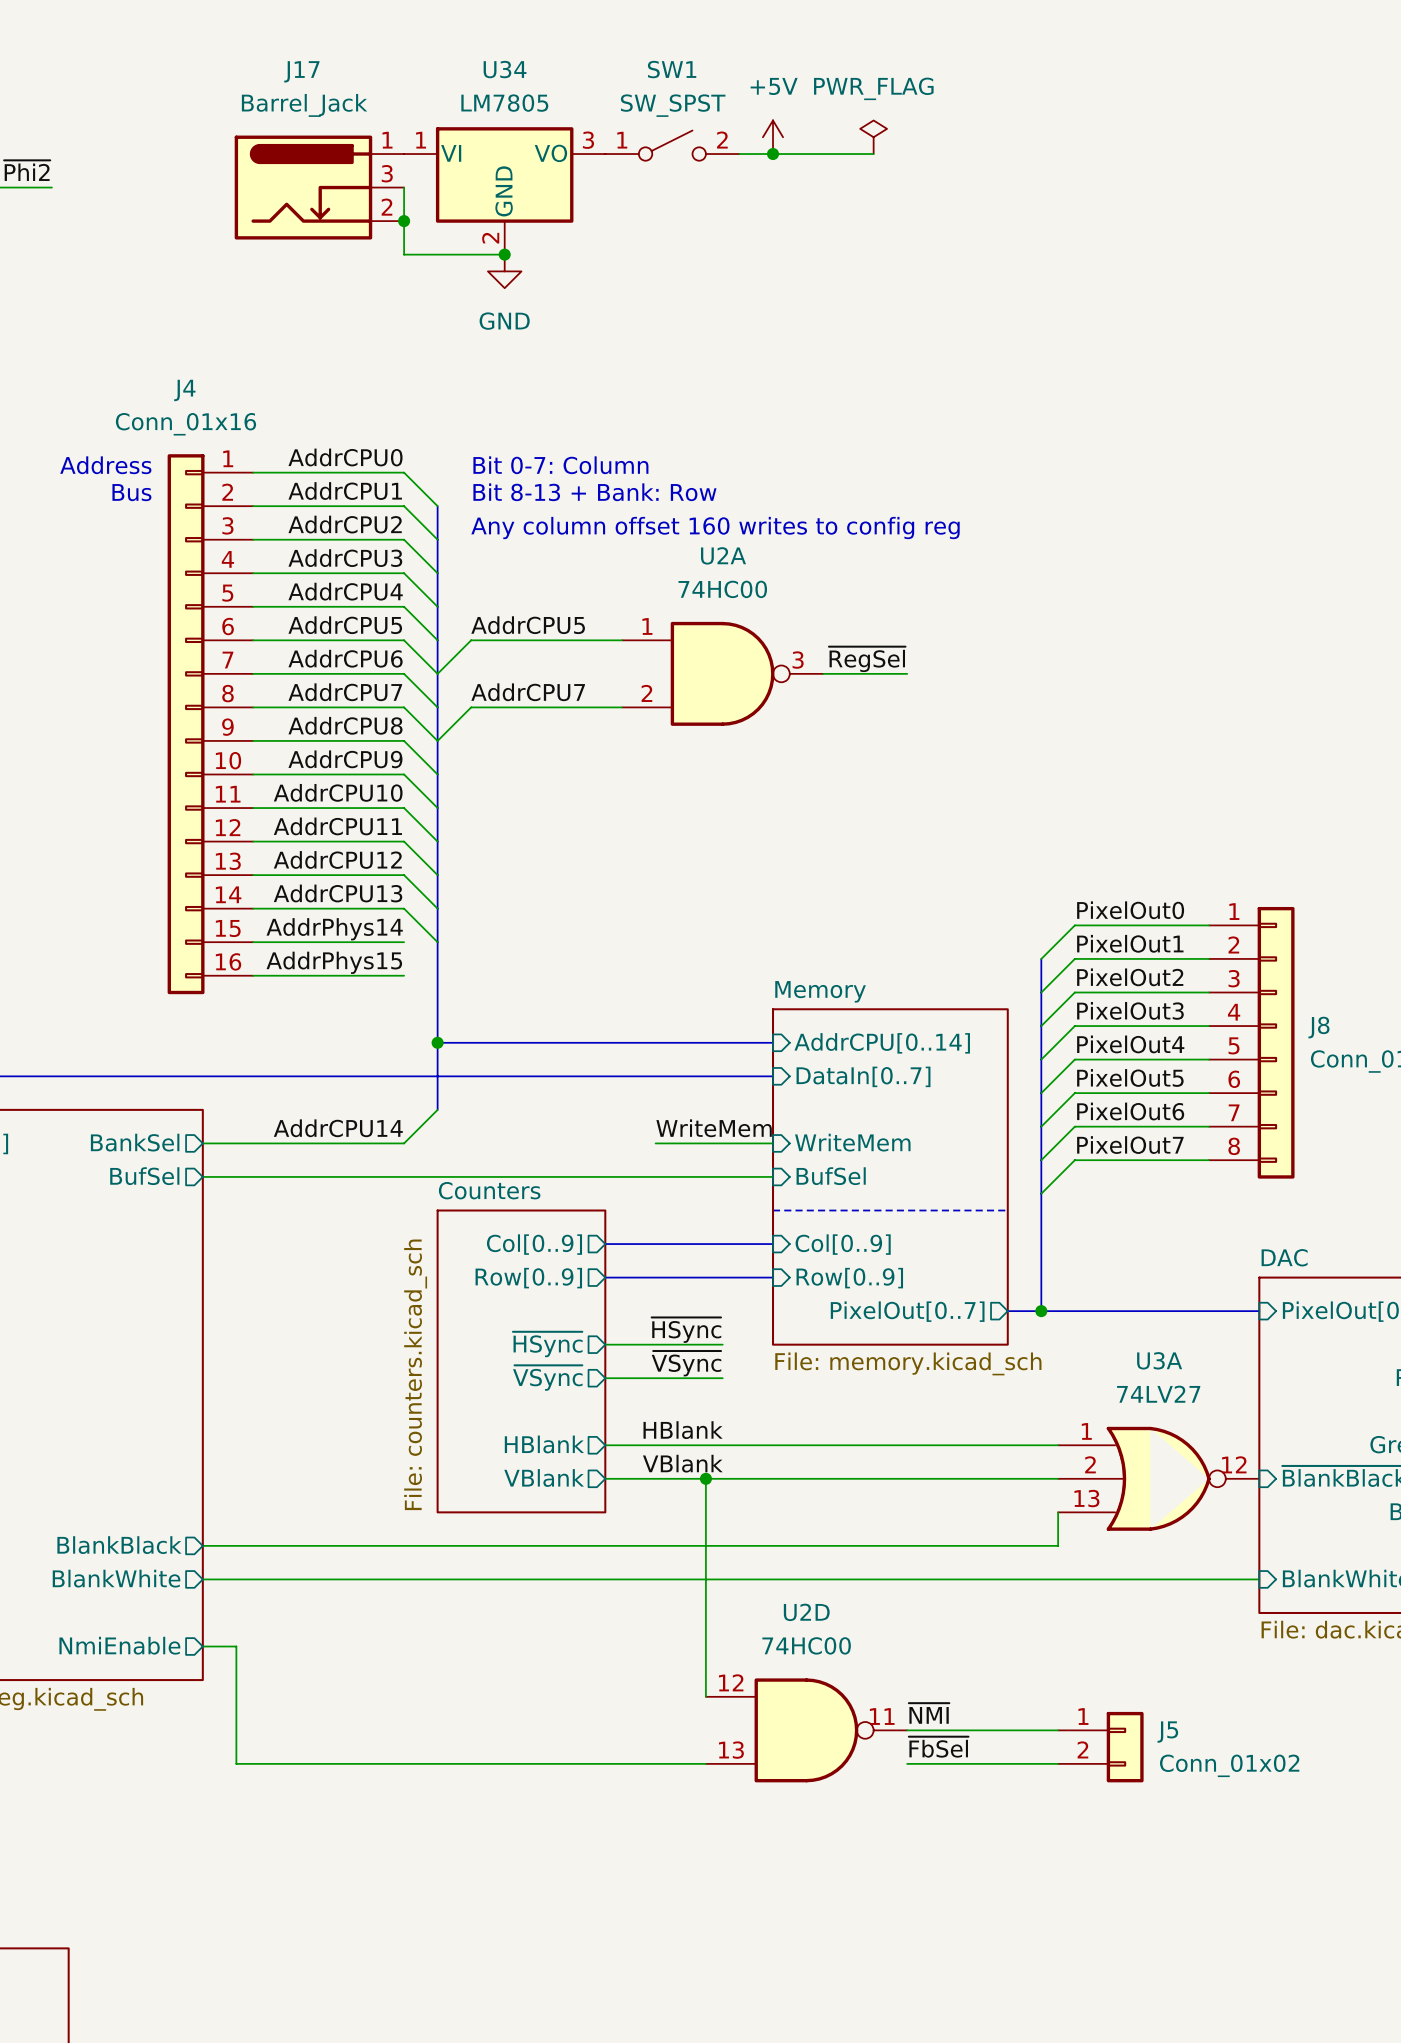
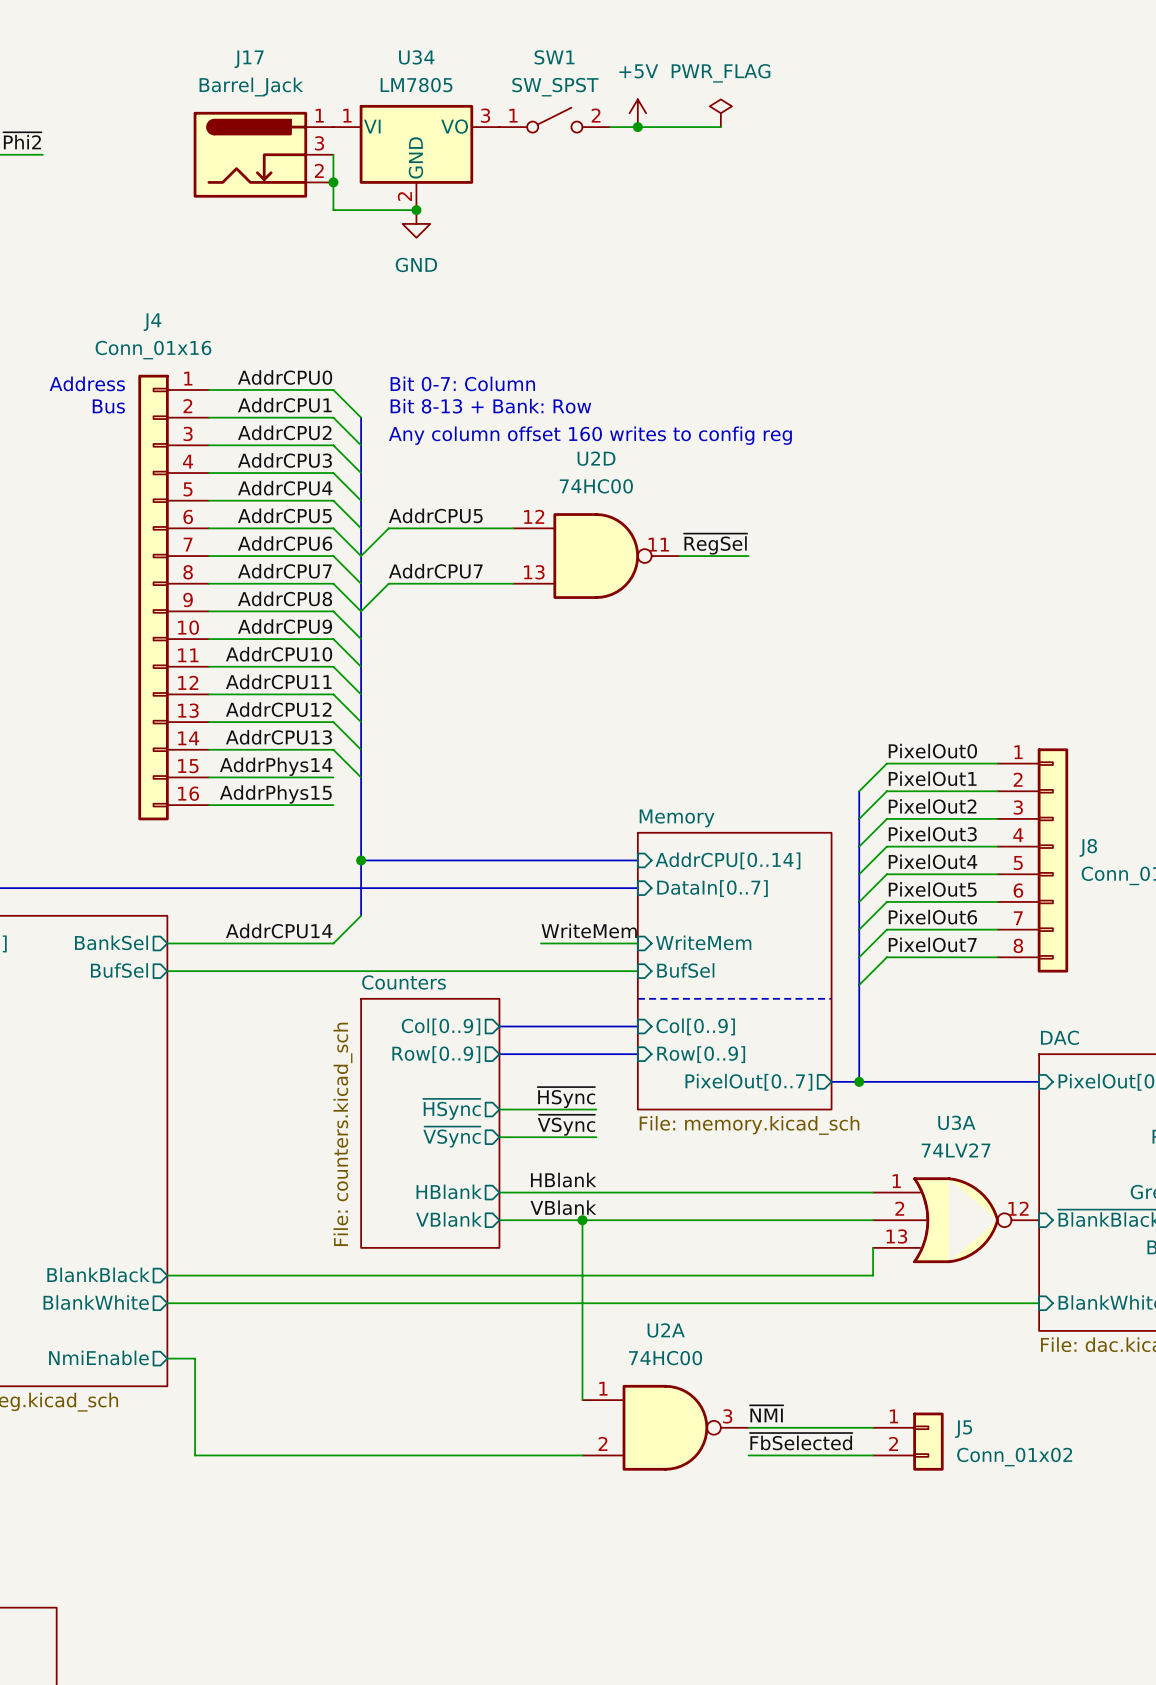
U2A position: (722, 673) -> (665, 1427)
U2D position: (806, 1730) -> (596, 556)
label: ~{FbSel} (938, 1747) -> ~{FbSelected} (801, 1441)

